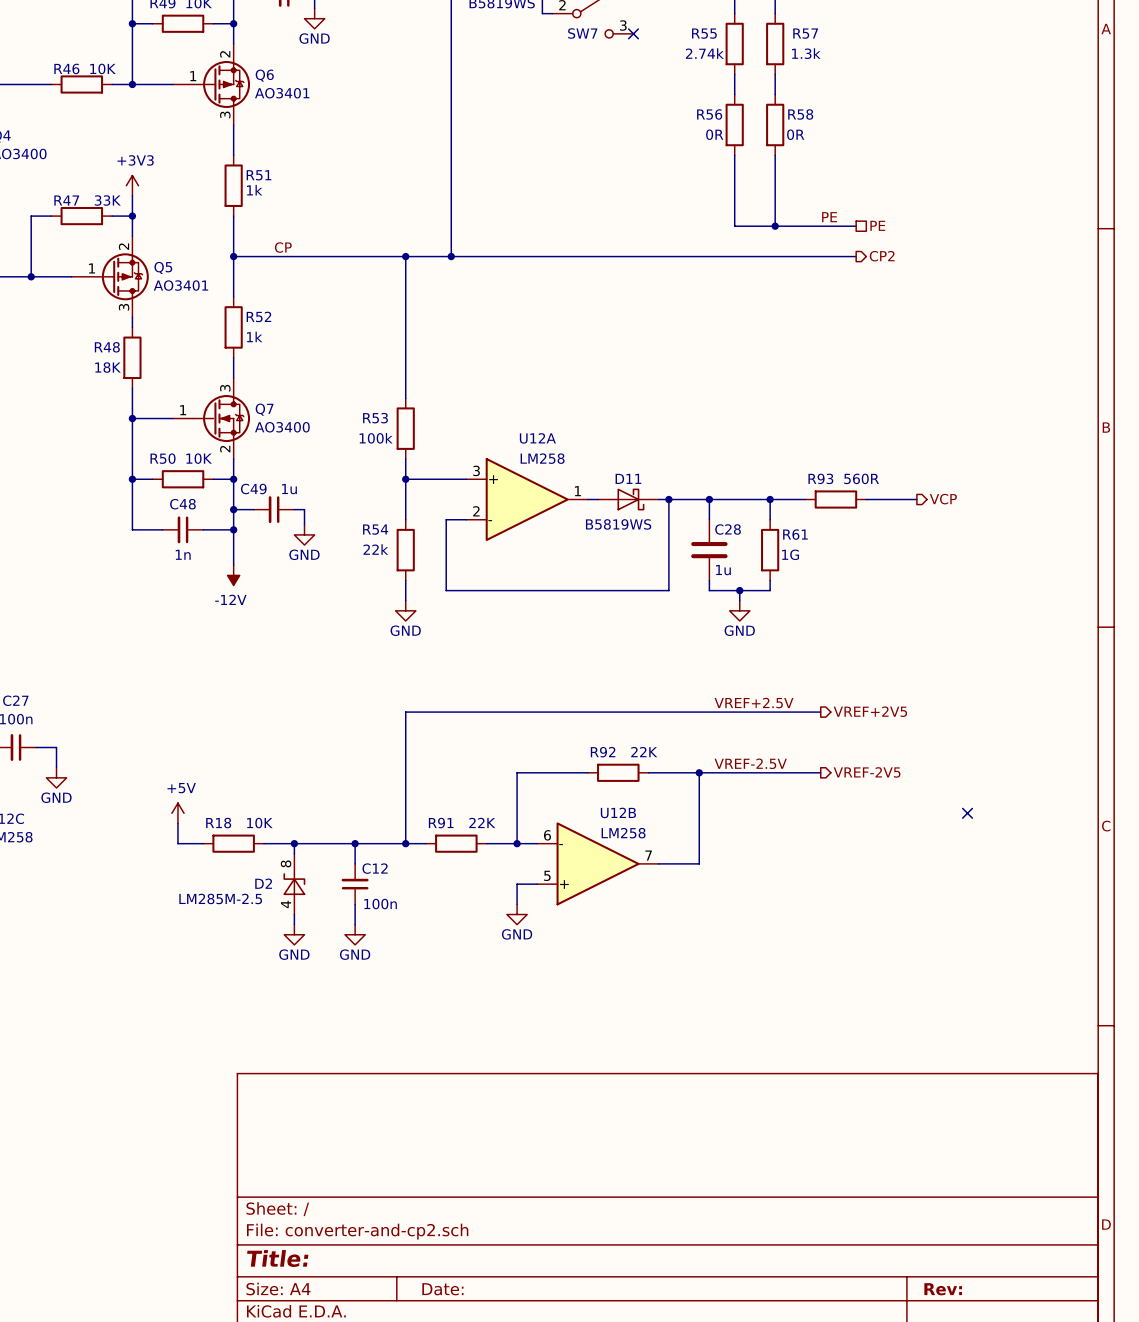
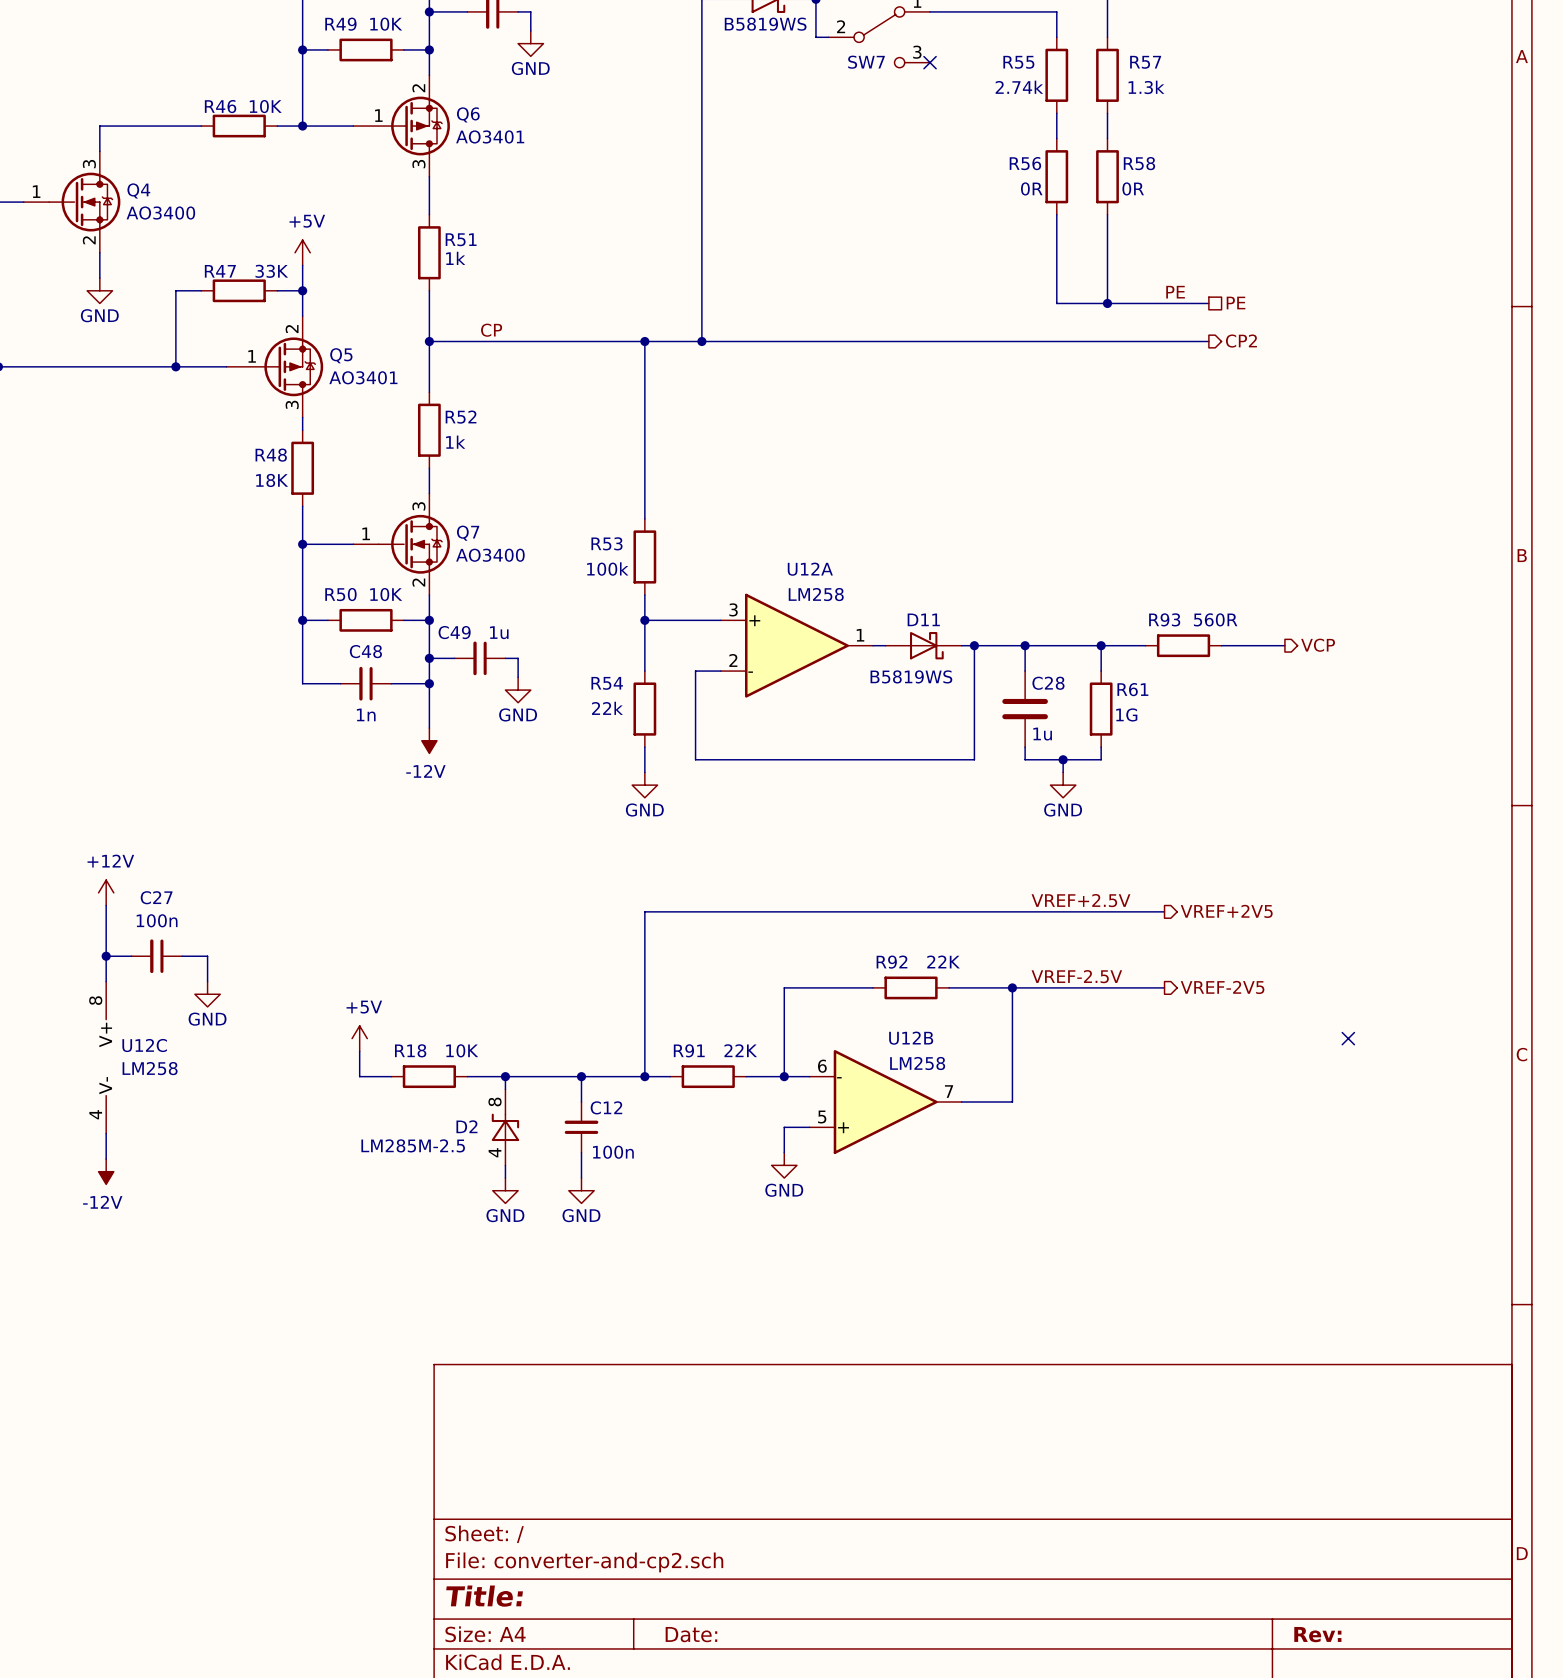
power symbol: +3V3 (132, 185) -> +5V (302, 252)

